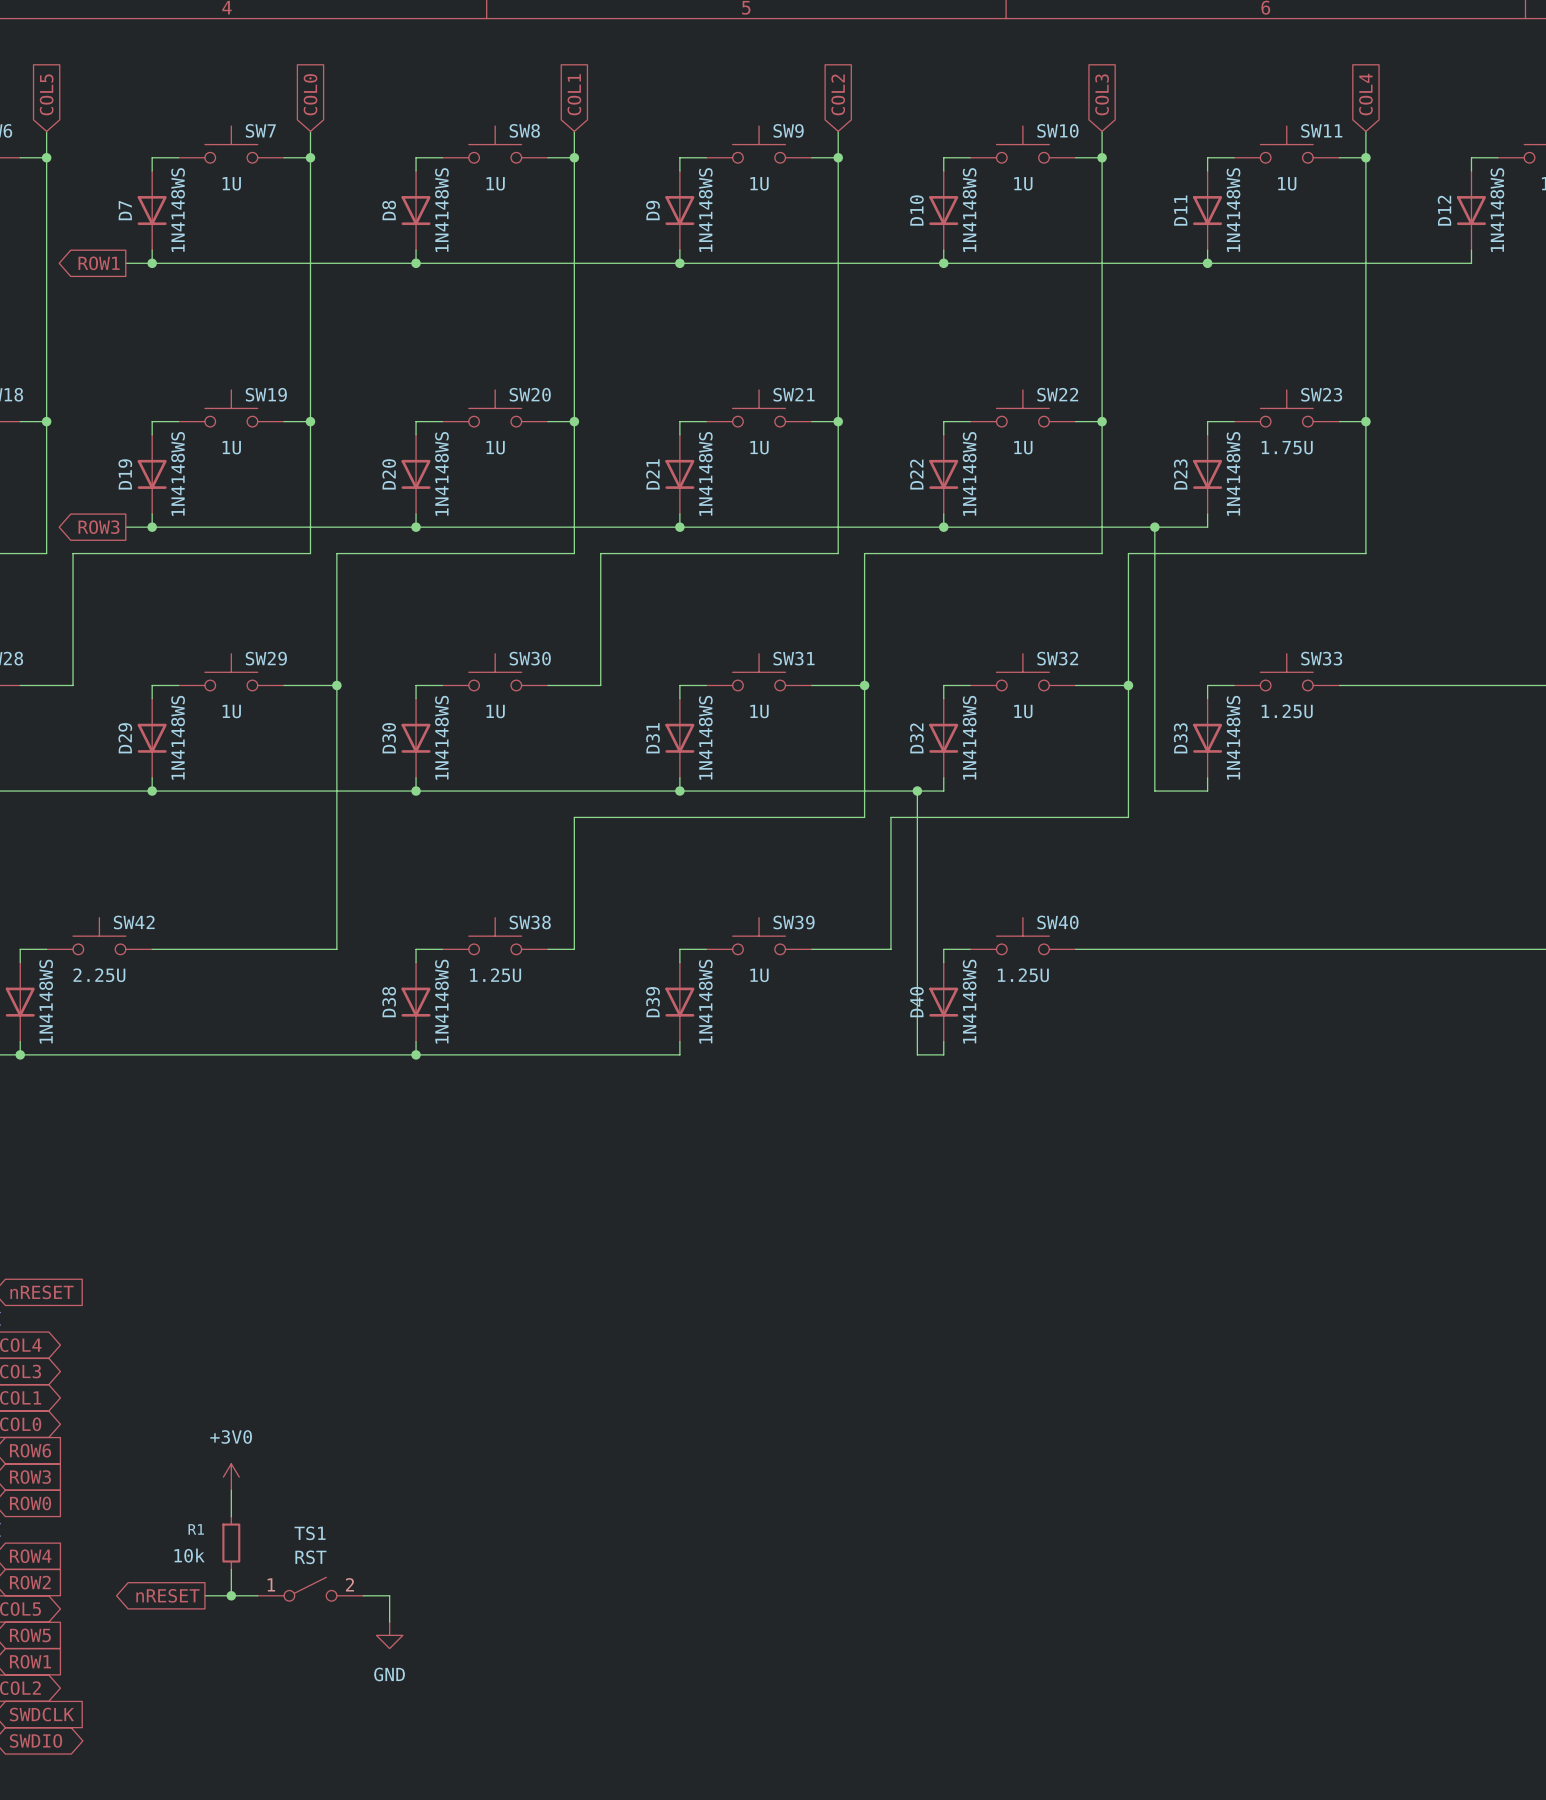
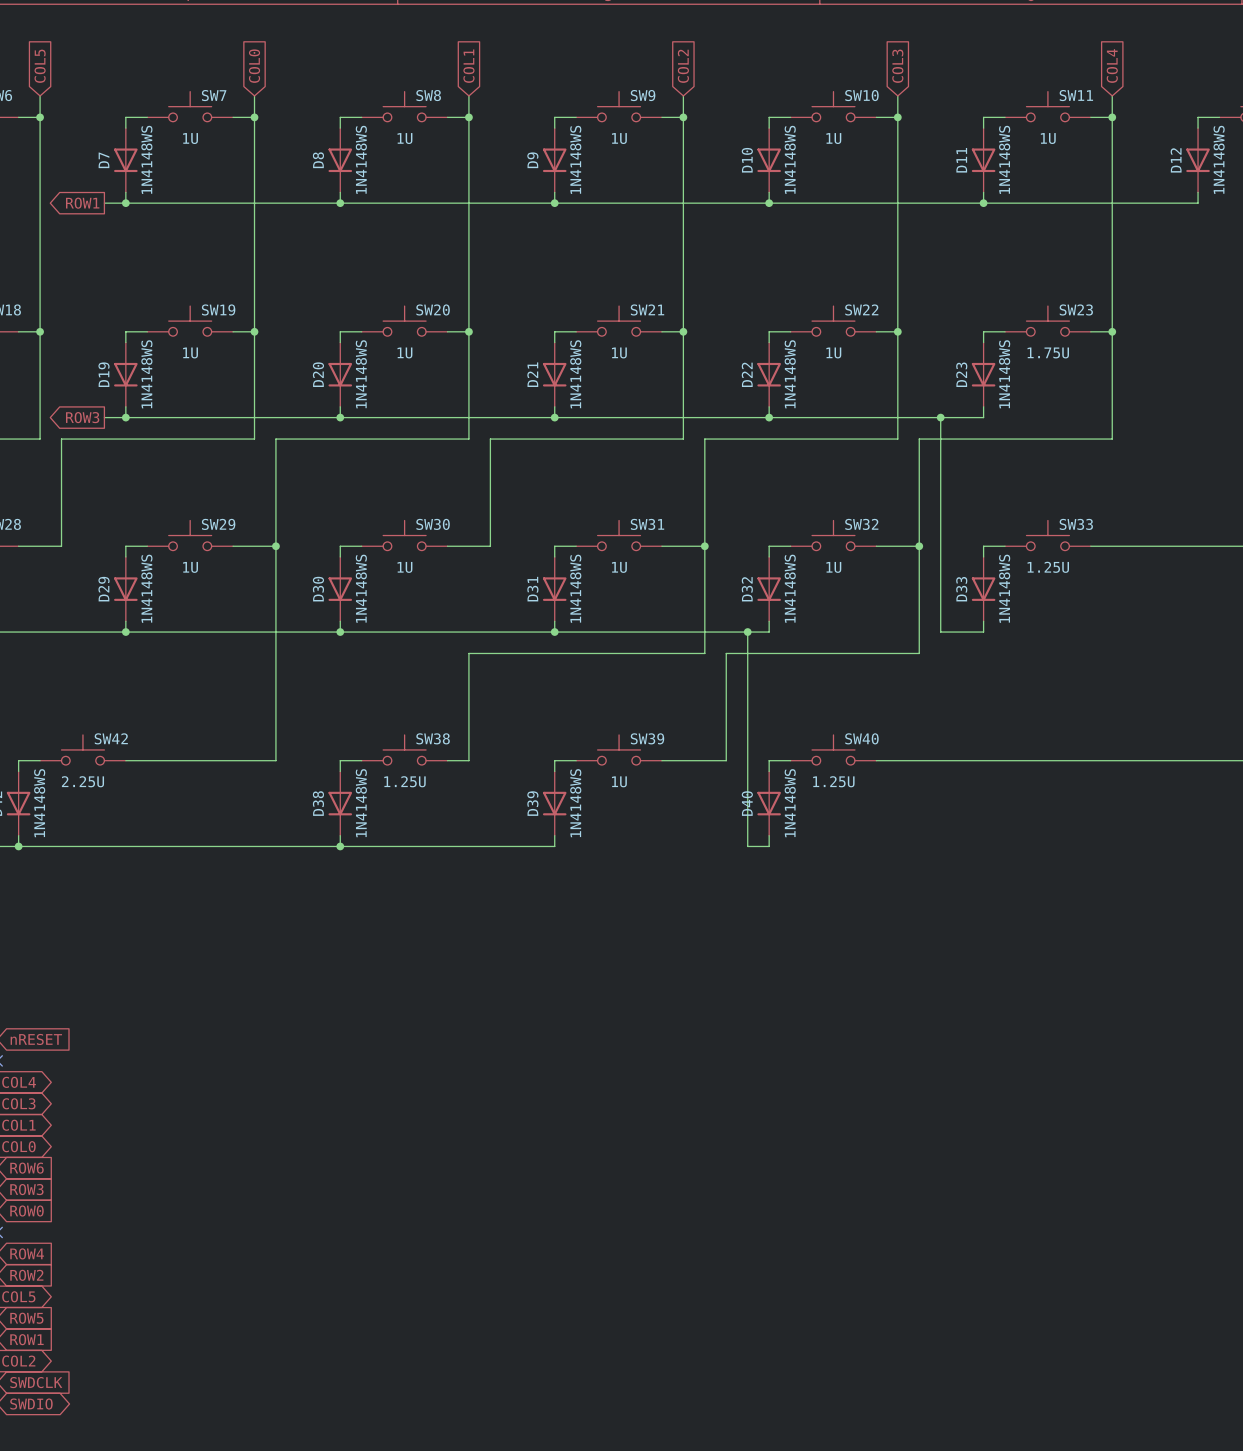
power symbol: +3V0 (231, 1477) -> none
wire: (231, 1490) (231, 1516) -> none
R1: 10k (231, 1543) -> none
wire: (231, 1569) (231, 1595) -> none
TS1: RST (310, 1589) -> none
global label: nRESET (167, 1595) -> none
wire: (204, 1595) (257, 1595) -> none
junction: (231, 1595) -> none
wire: (363, 1595) (389, 1595) (389, 1622) -> none
power symbol: GND (389, 1635) -> none

